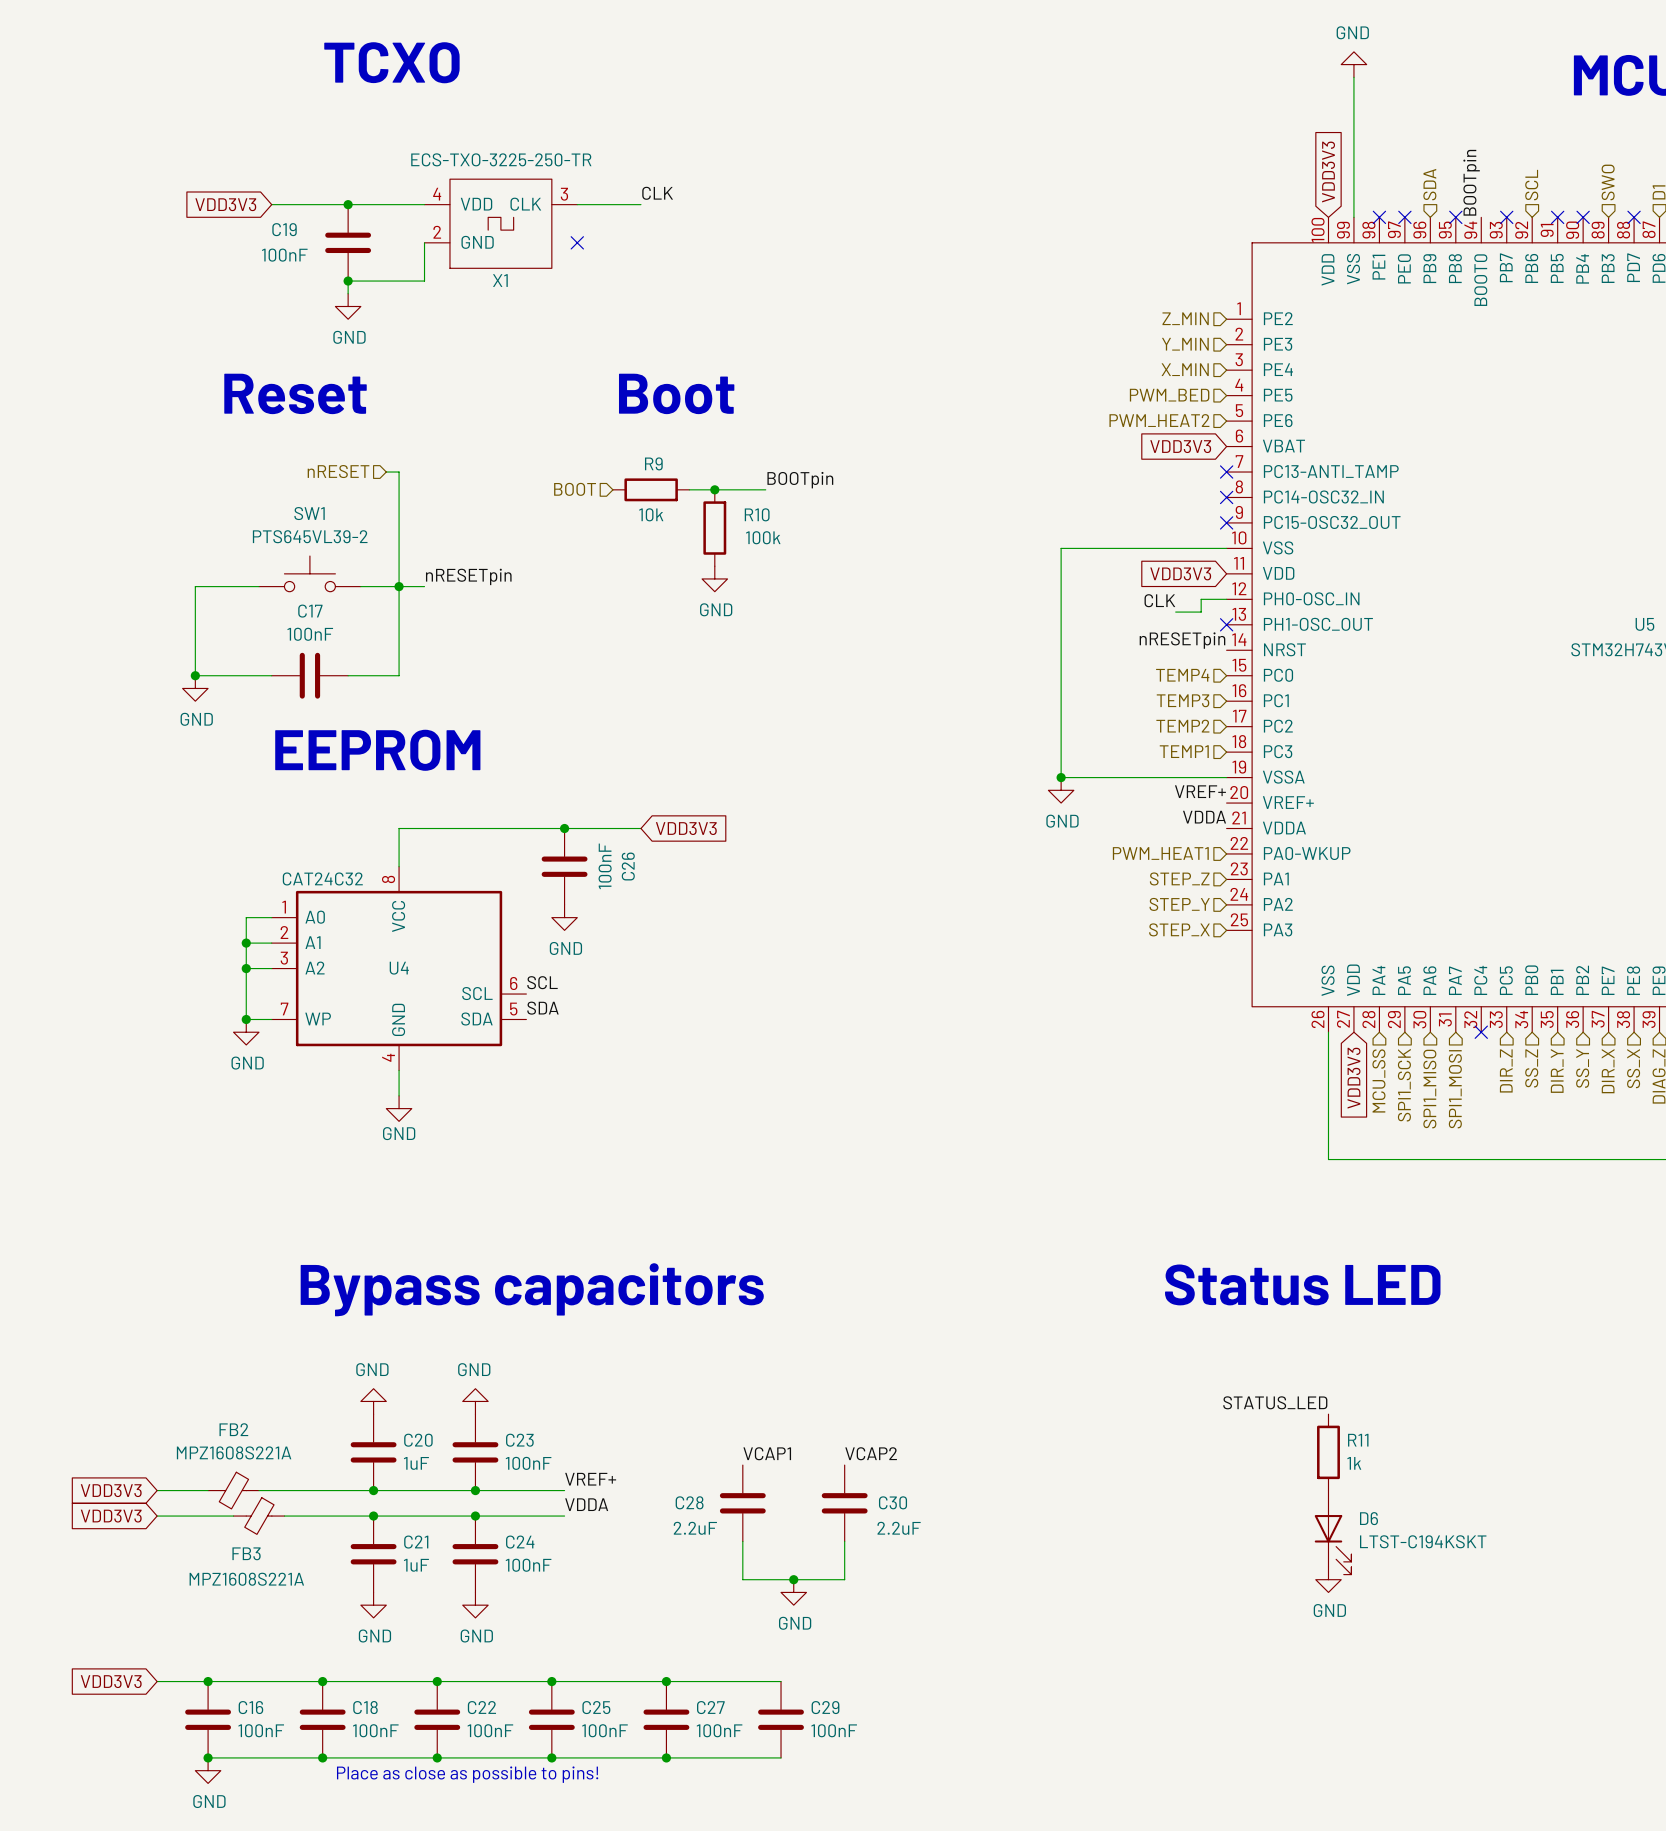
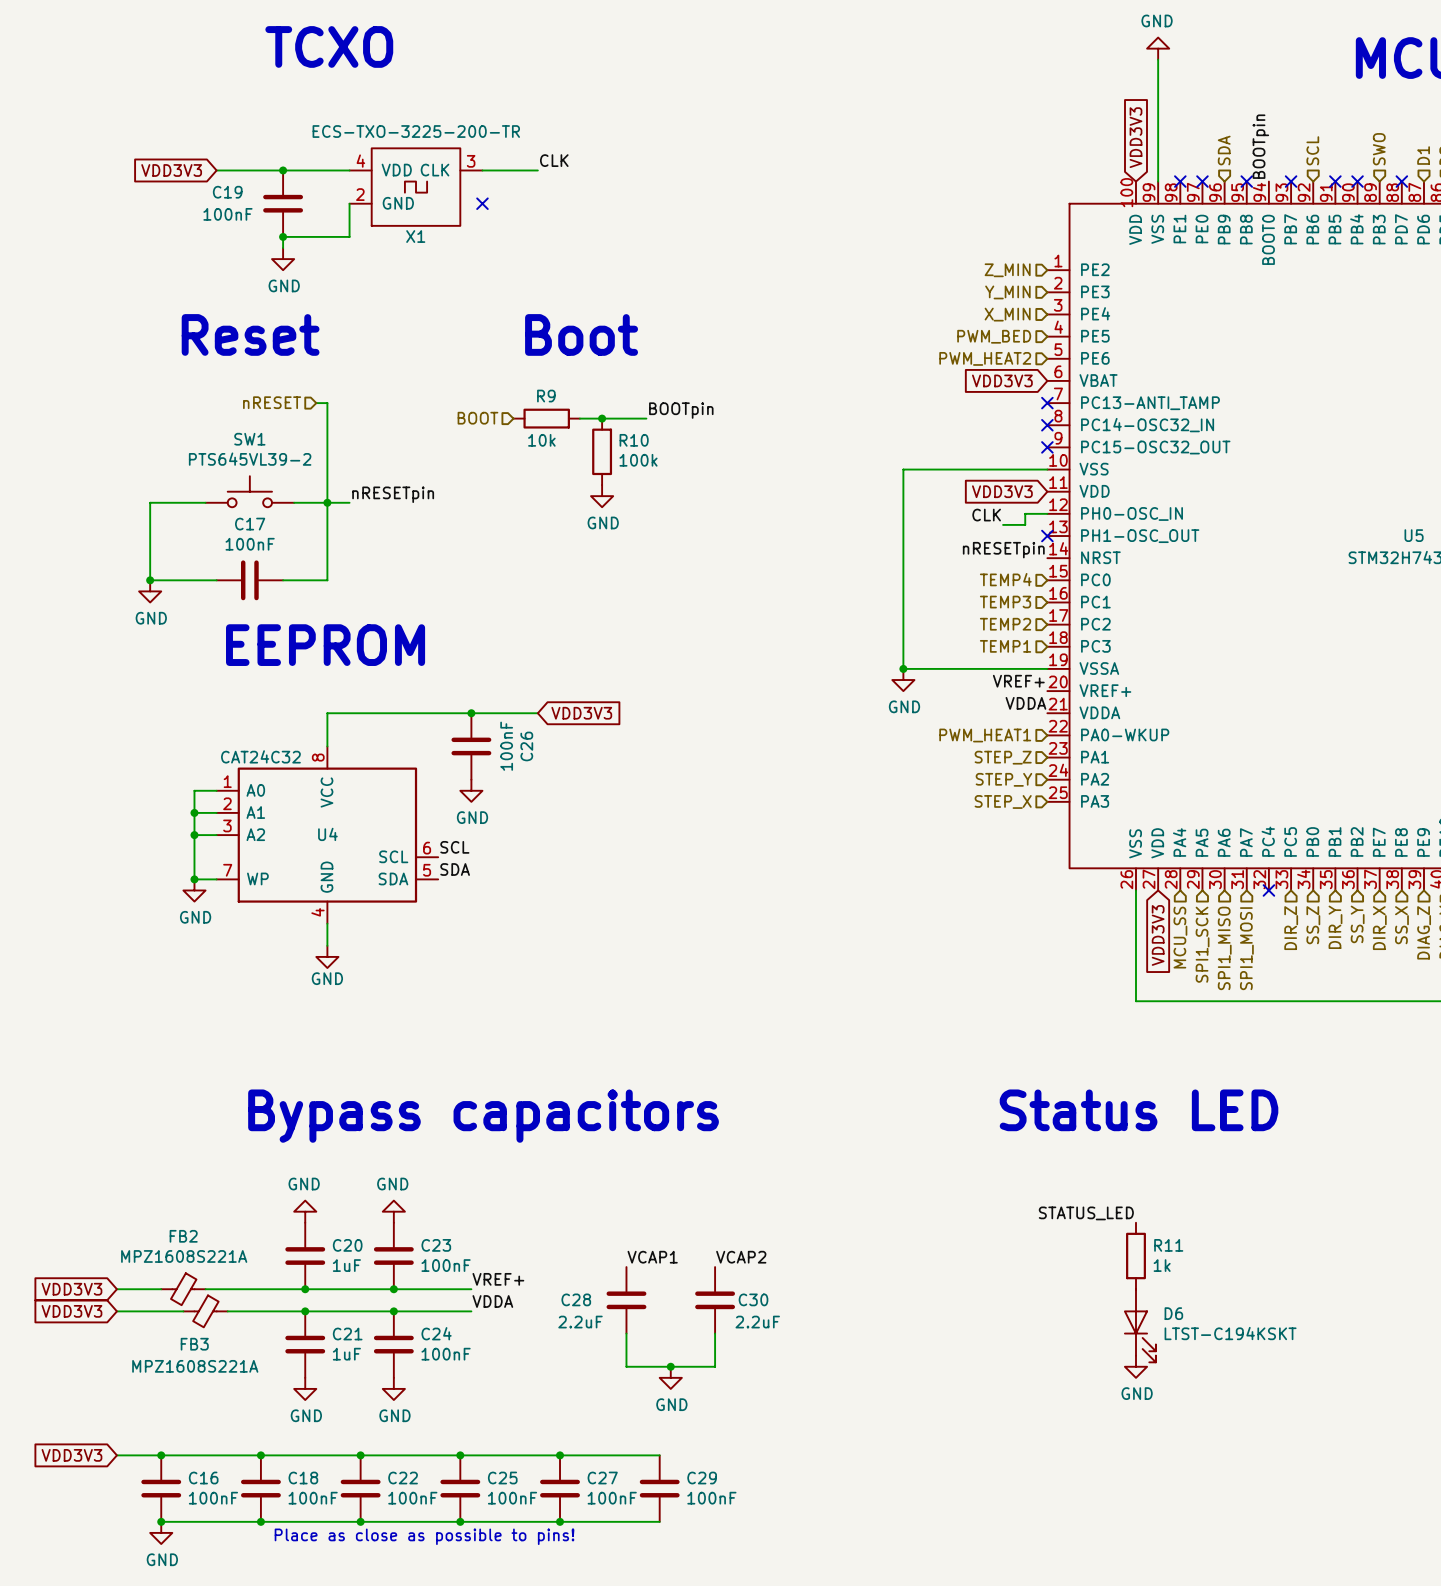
X1 value: ECS-TXO-3225-250-TR (501, 159) -> ECS-TXO-3225-200-TR (416, 131)

